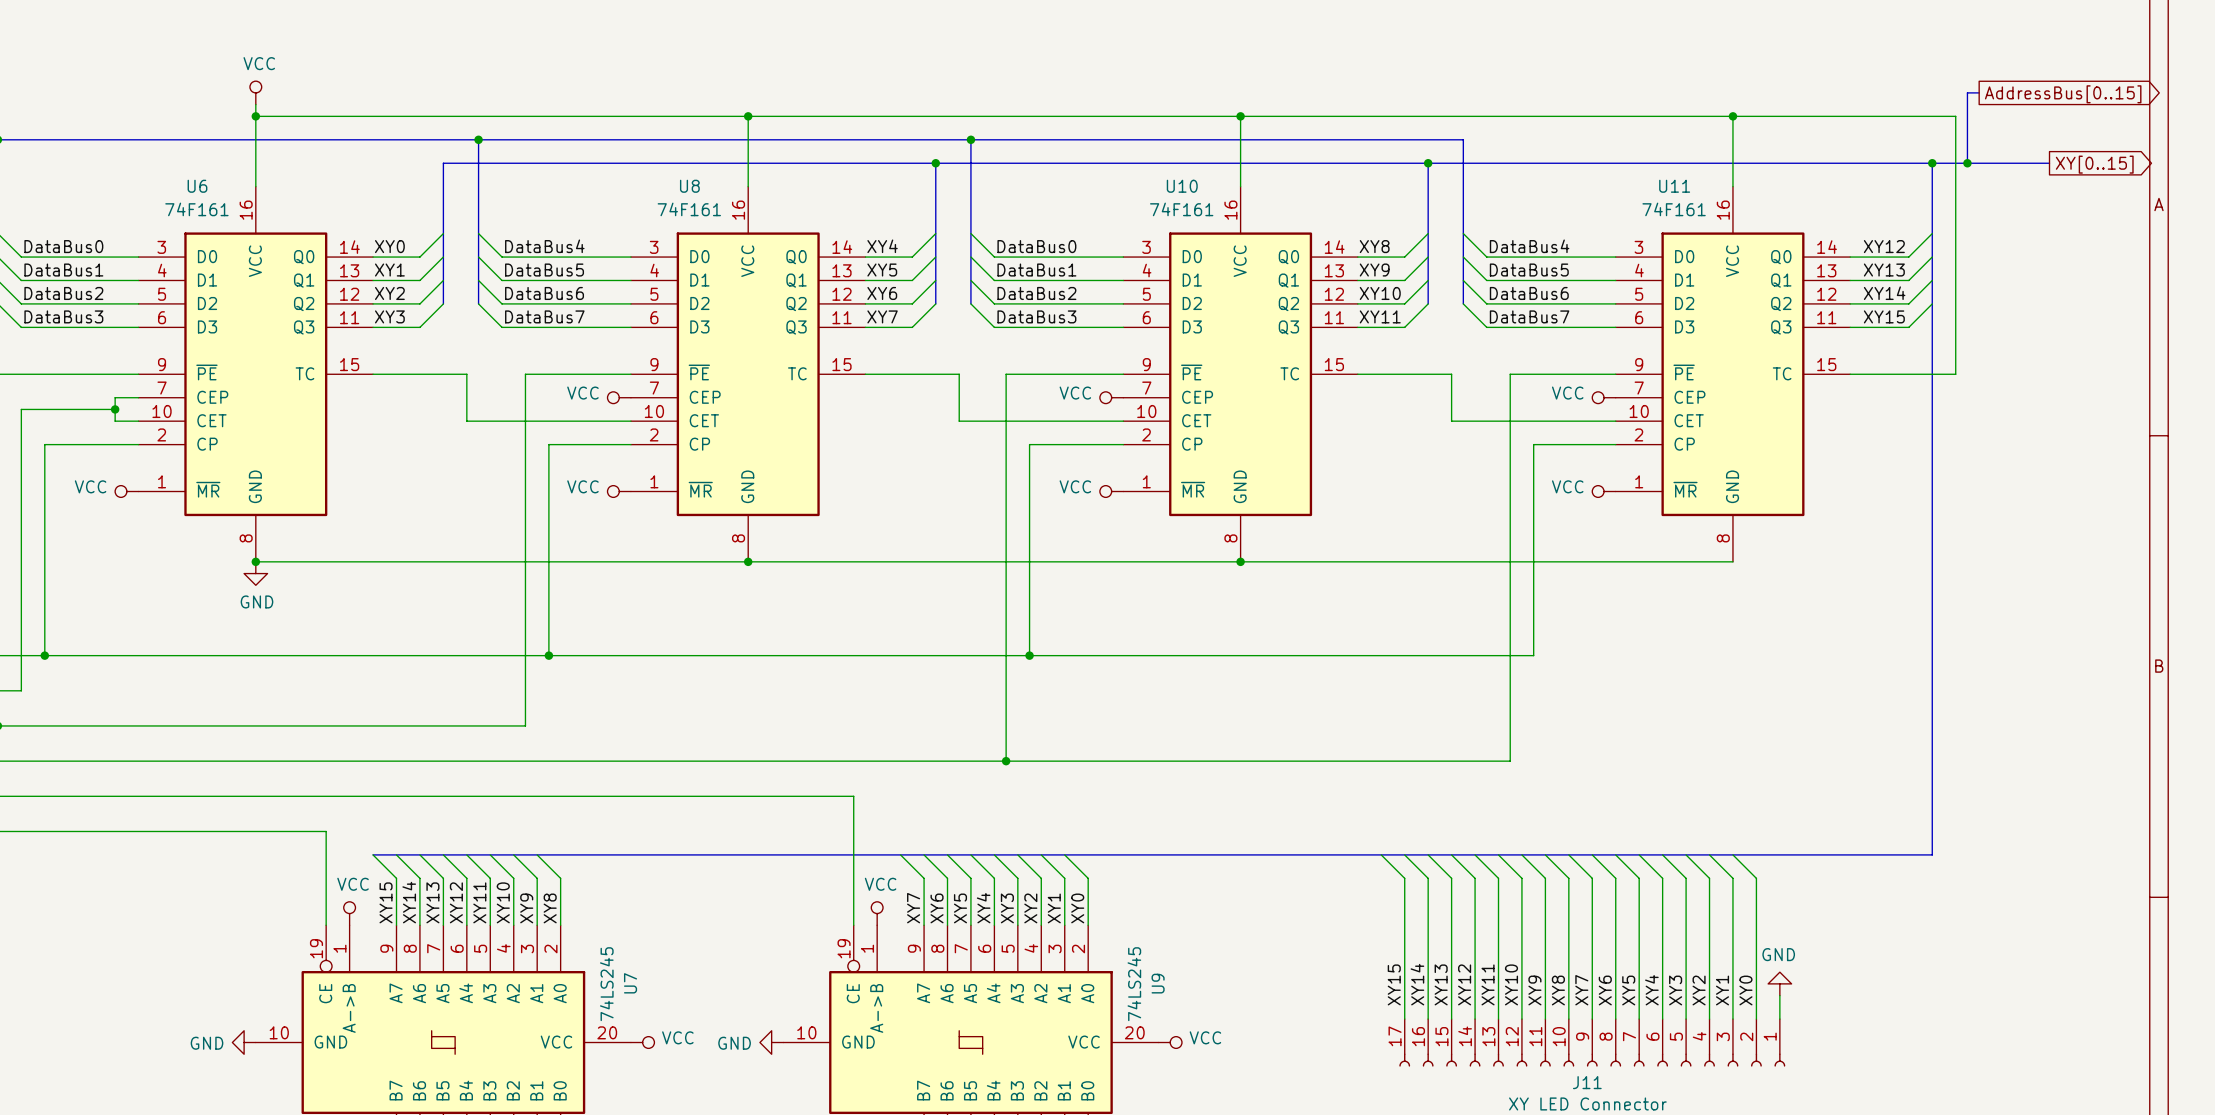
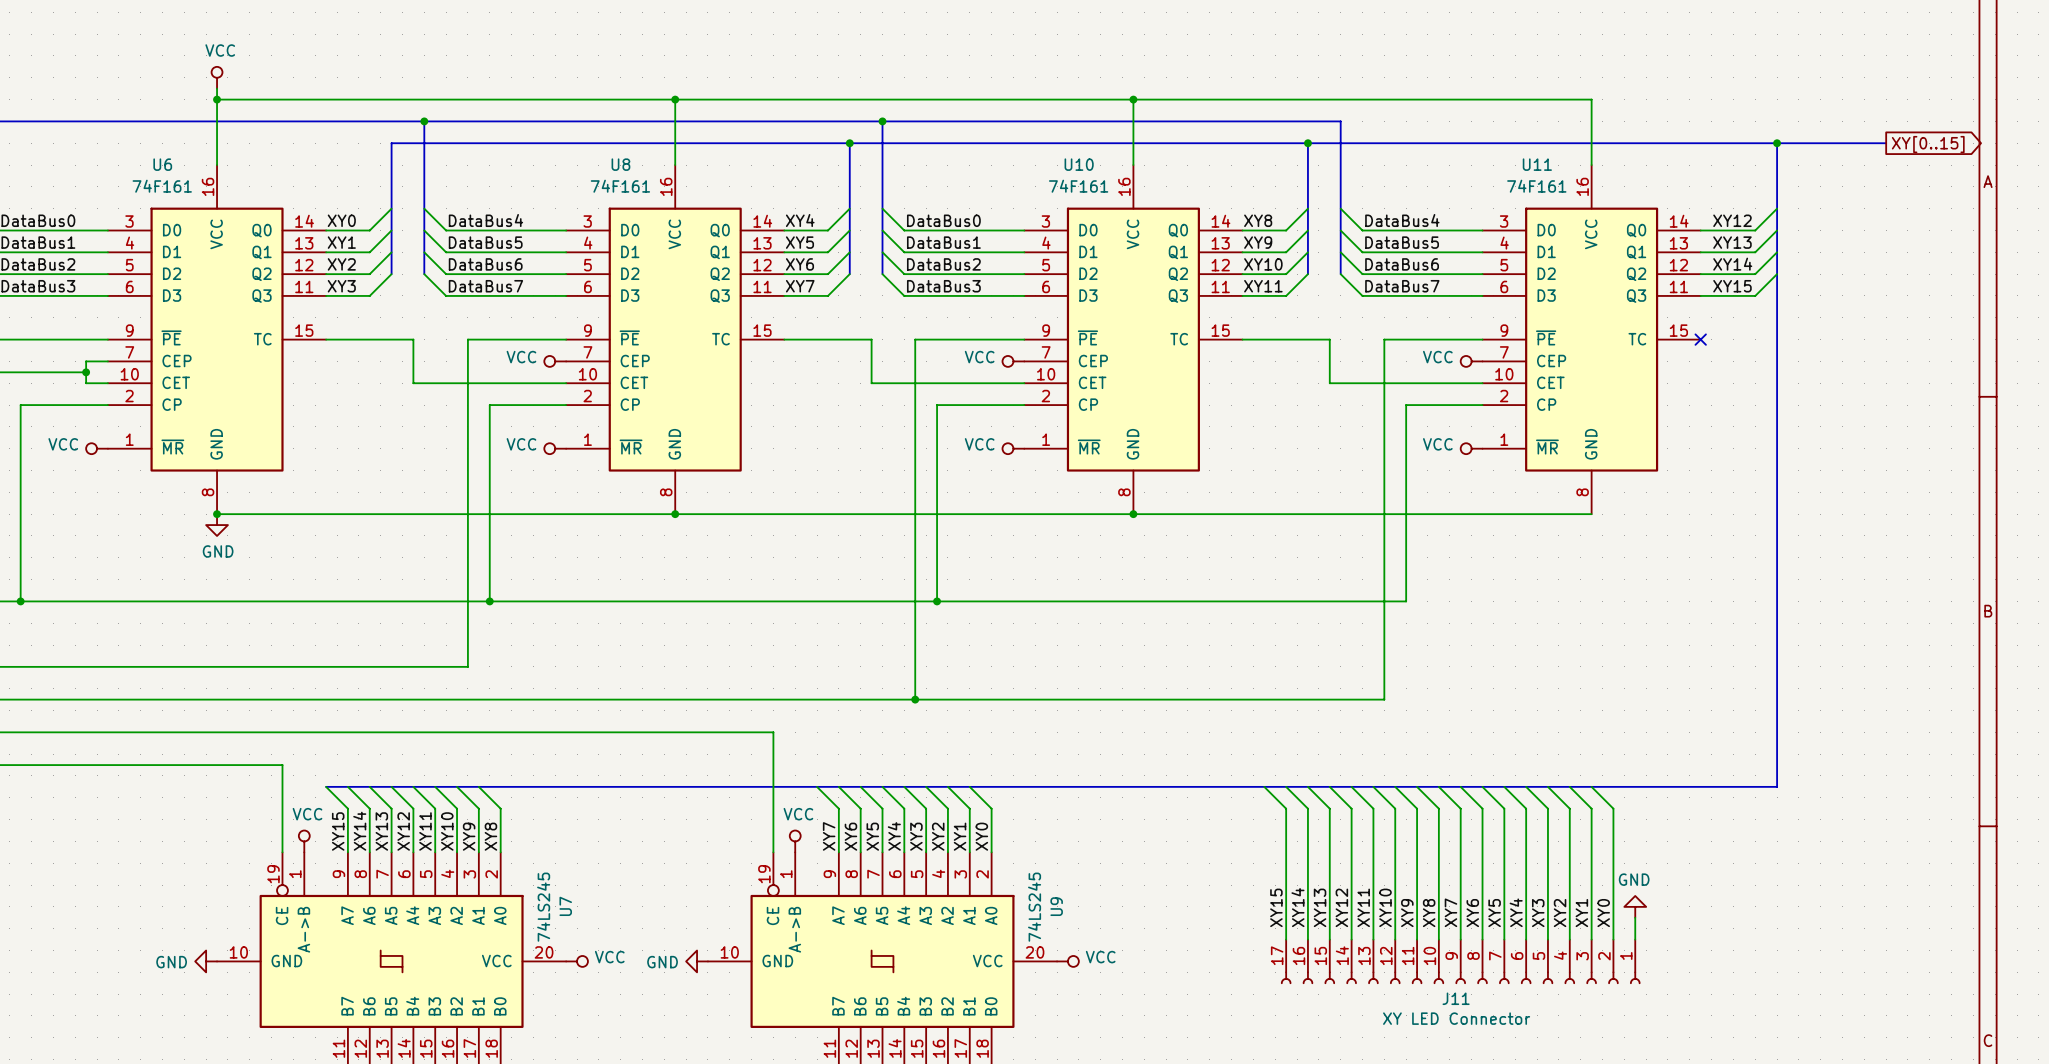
bus: (1979, 92) (1967, 92) (1967, 163) -> none
global label: AddressBus[0..15] (2063, 94) -> none
wire: (1732, 116) (1955, 116) (1955, 374) (1850, 374) -> none
junction: (1732, 116) -> none
junction: (1967, 163) -> none
no-connect mark: none -> (1700, 339)

